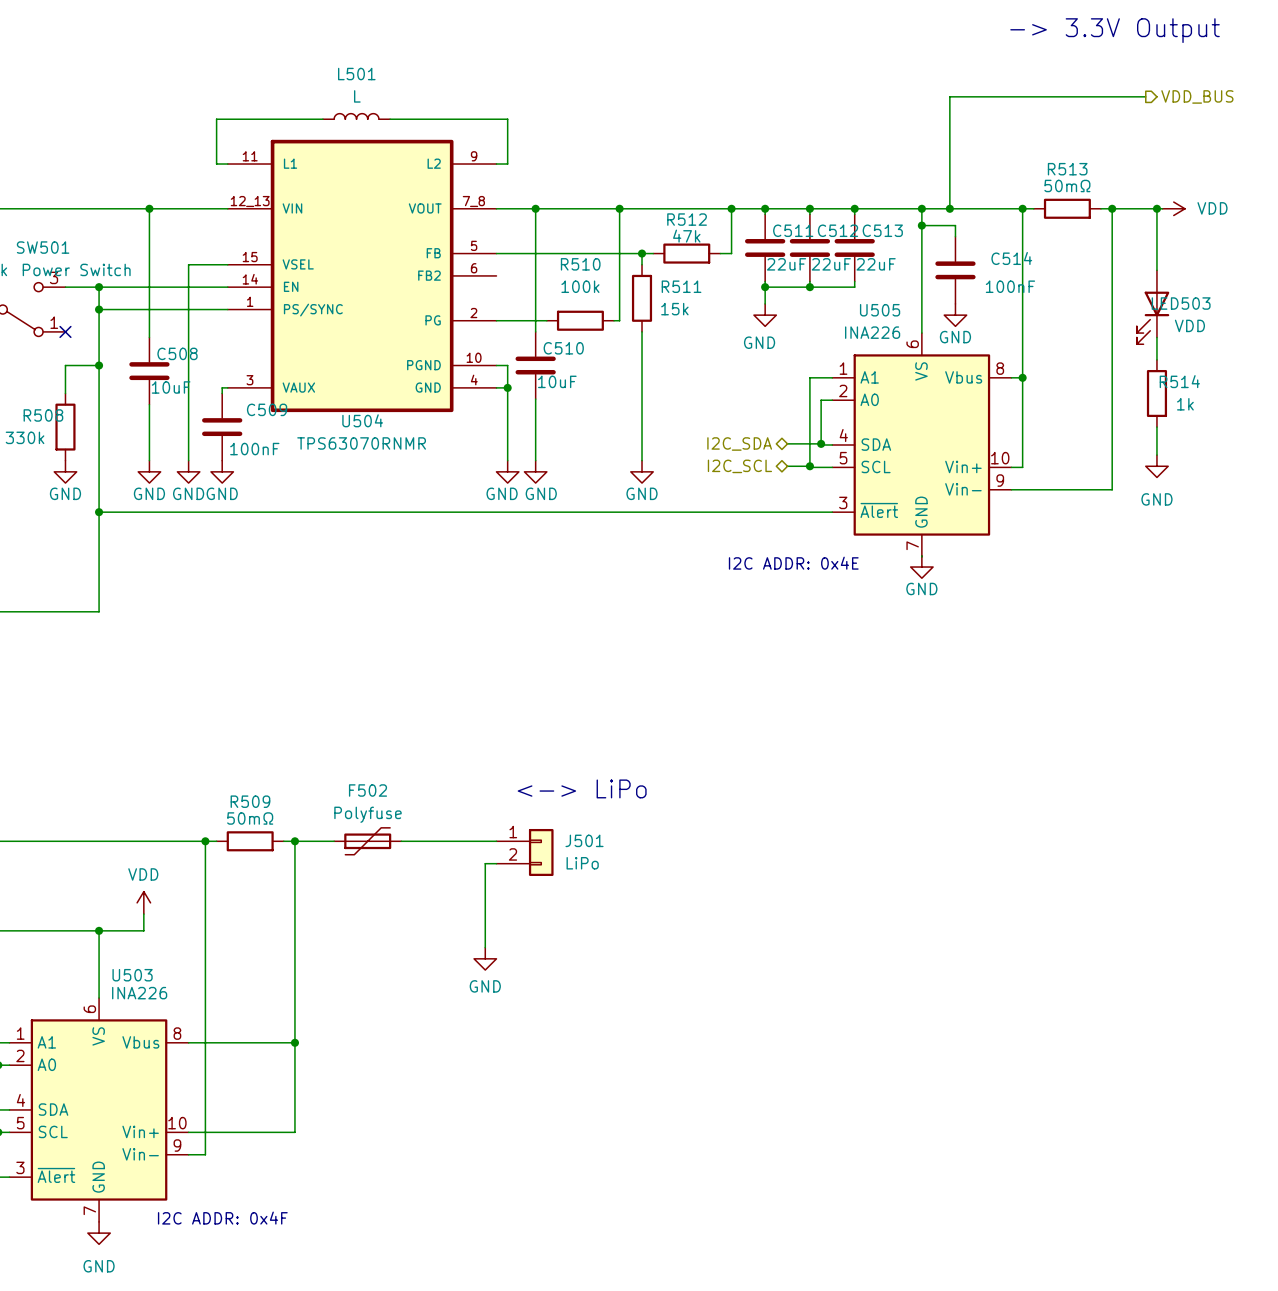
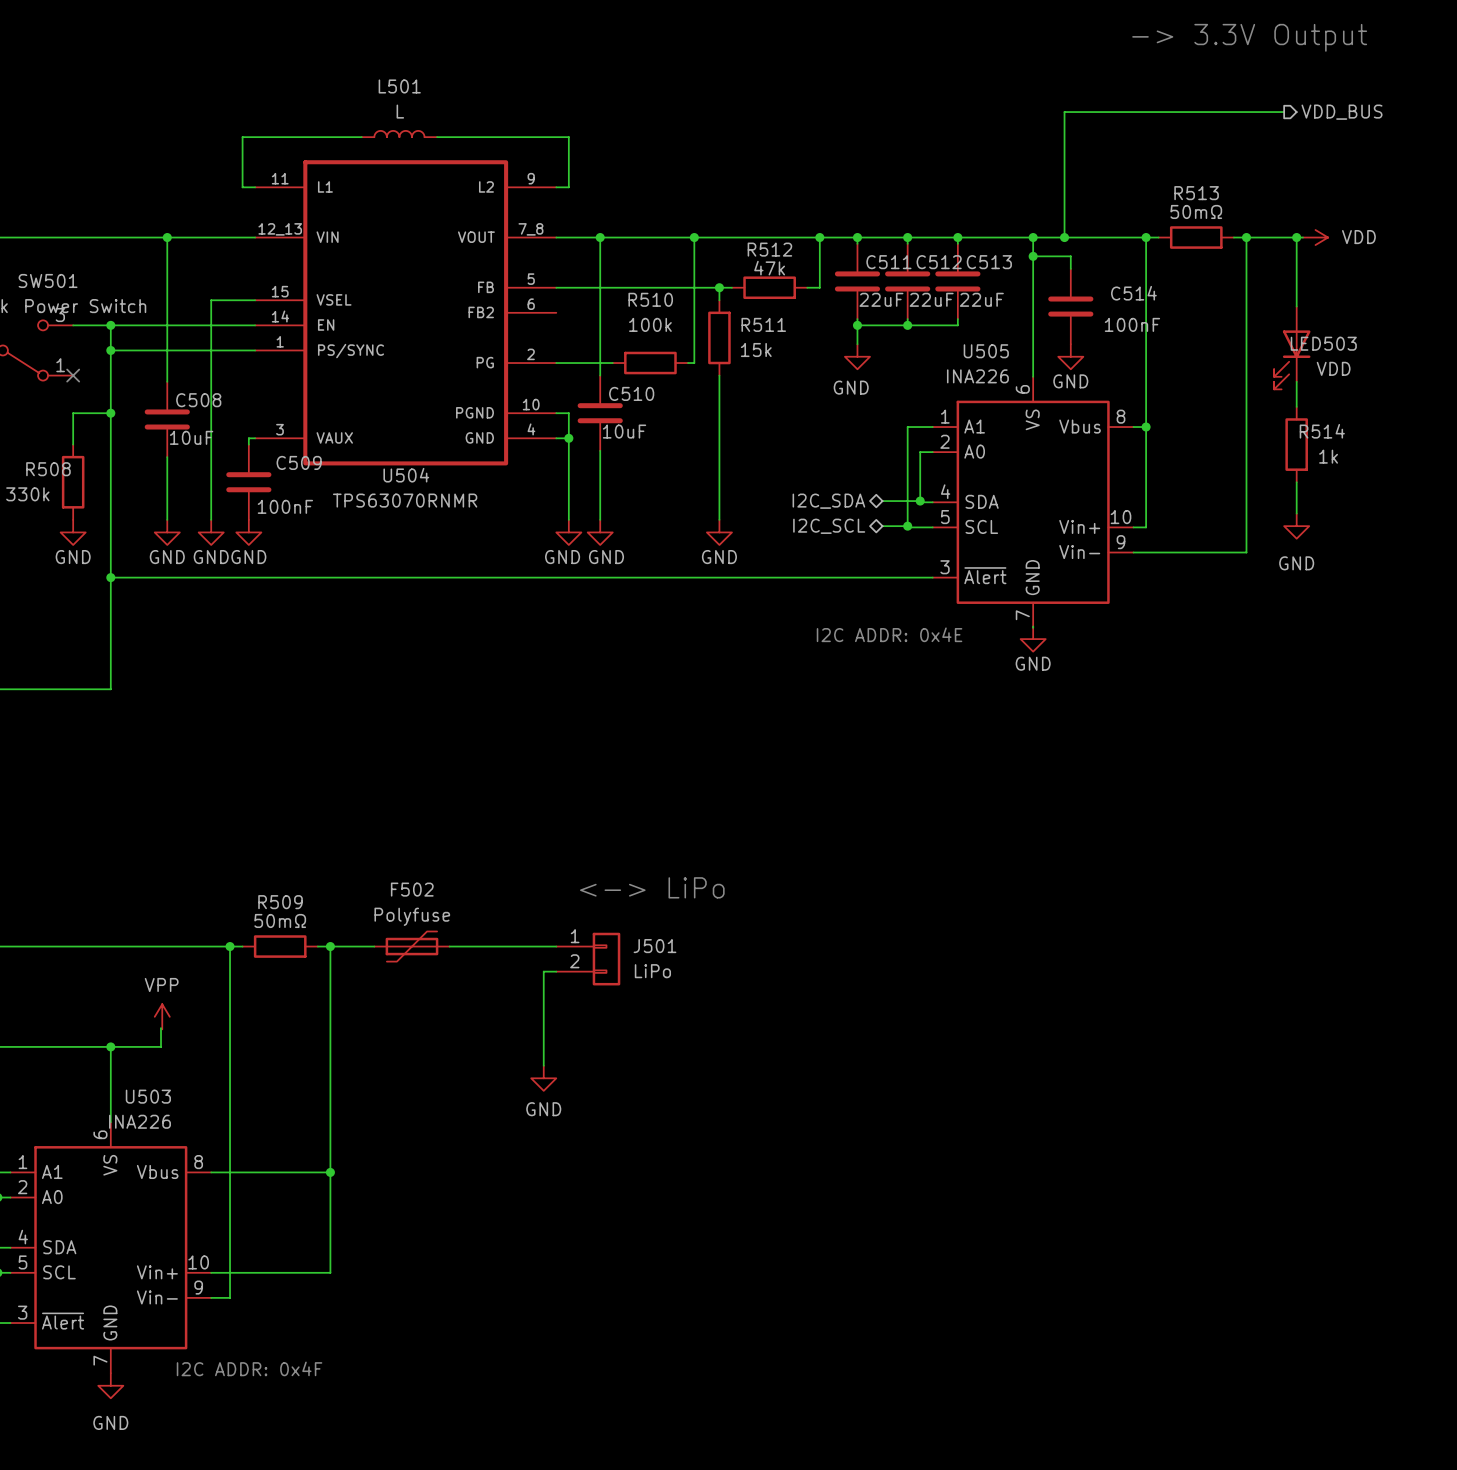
power symbol: VDD (143, 902) -> VPP (162, 1016)
U503 value position: INA226 (139, 993) -> INA226 (139, 1121)

